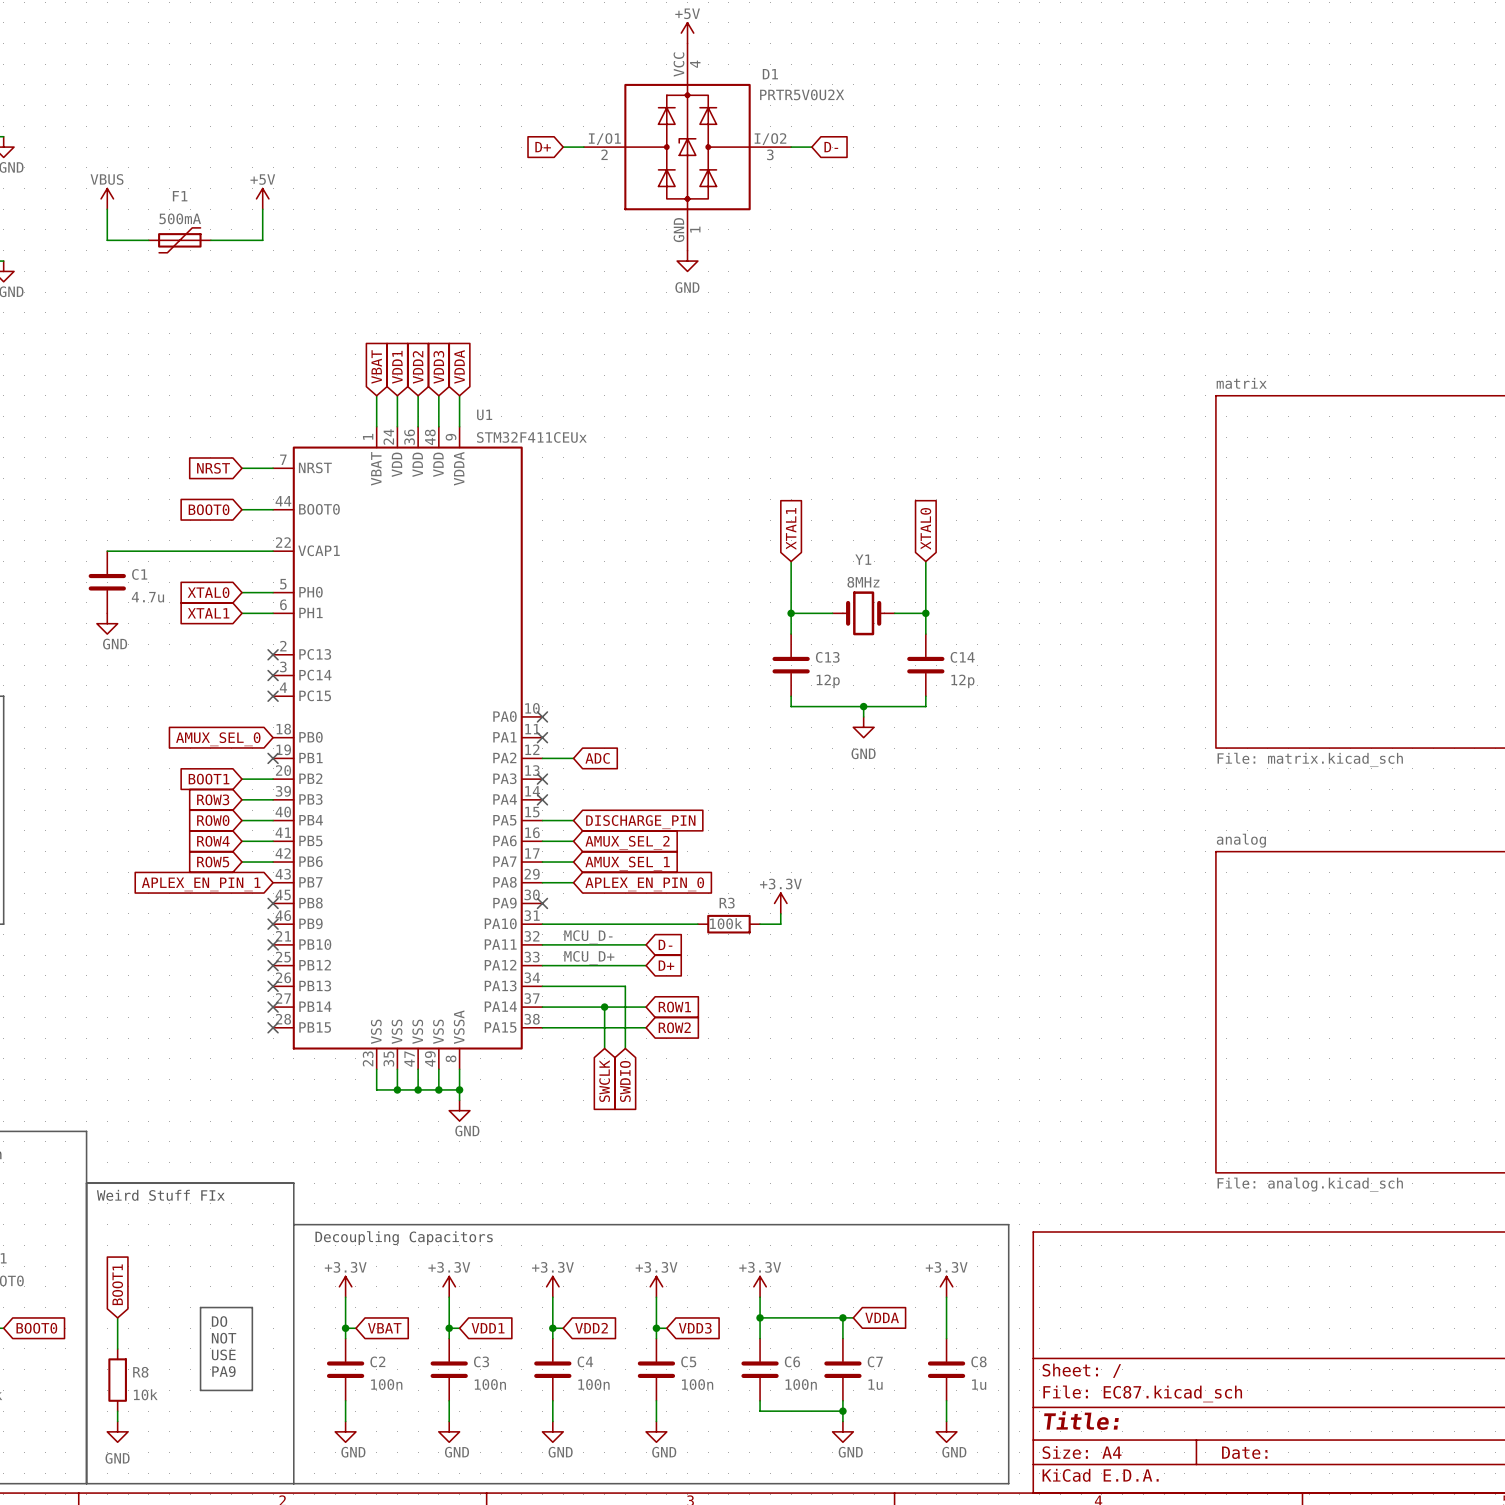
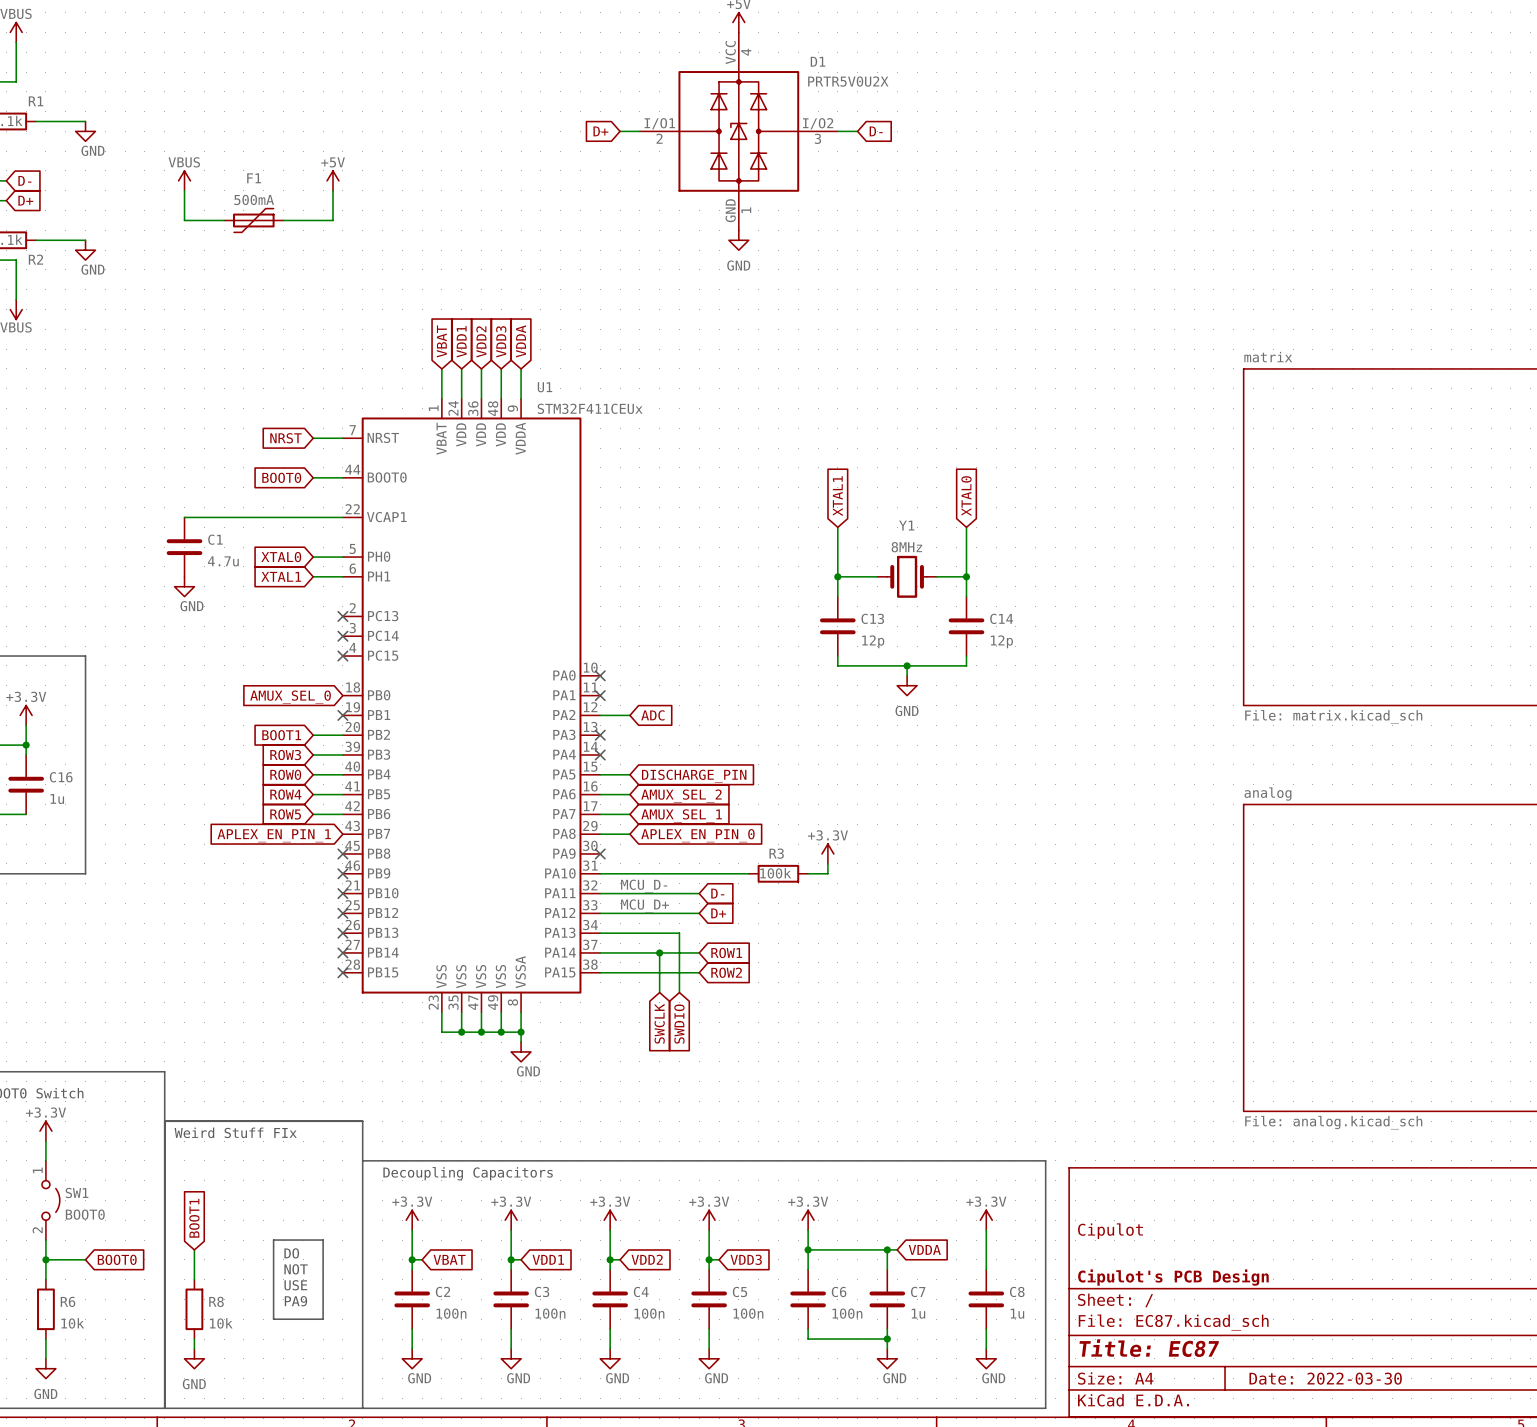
title block: none -> Cipulot (1110, 1231)
title block: none -> Cipulot's PCB Design (1173, 1277)
title block: Title: (1081, 1420) -> Title: EC87 (1149, 1348)
title block: Date: (1244, 1452) -> Date: 2022-03-30 (1325, 1378)

